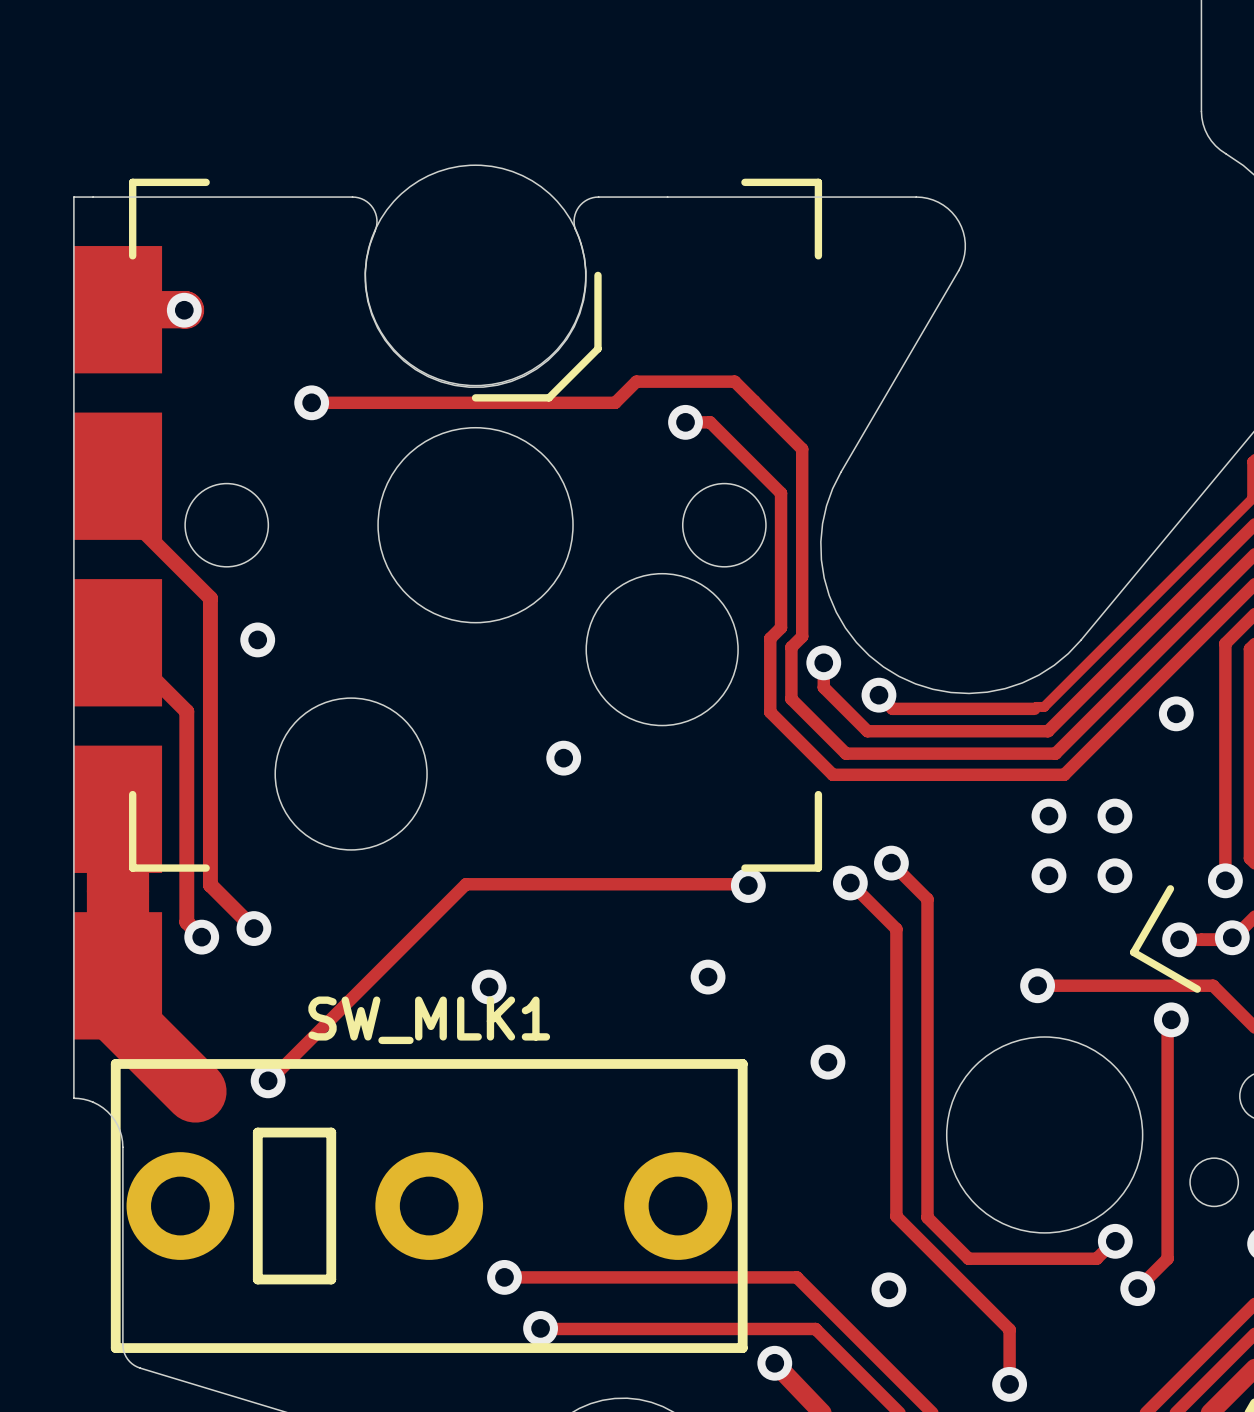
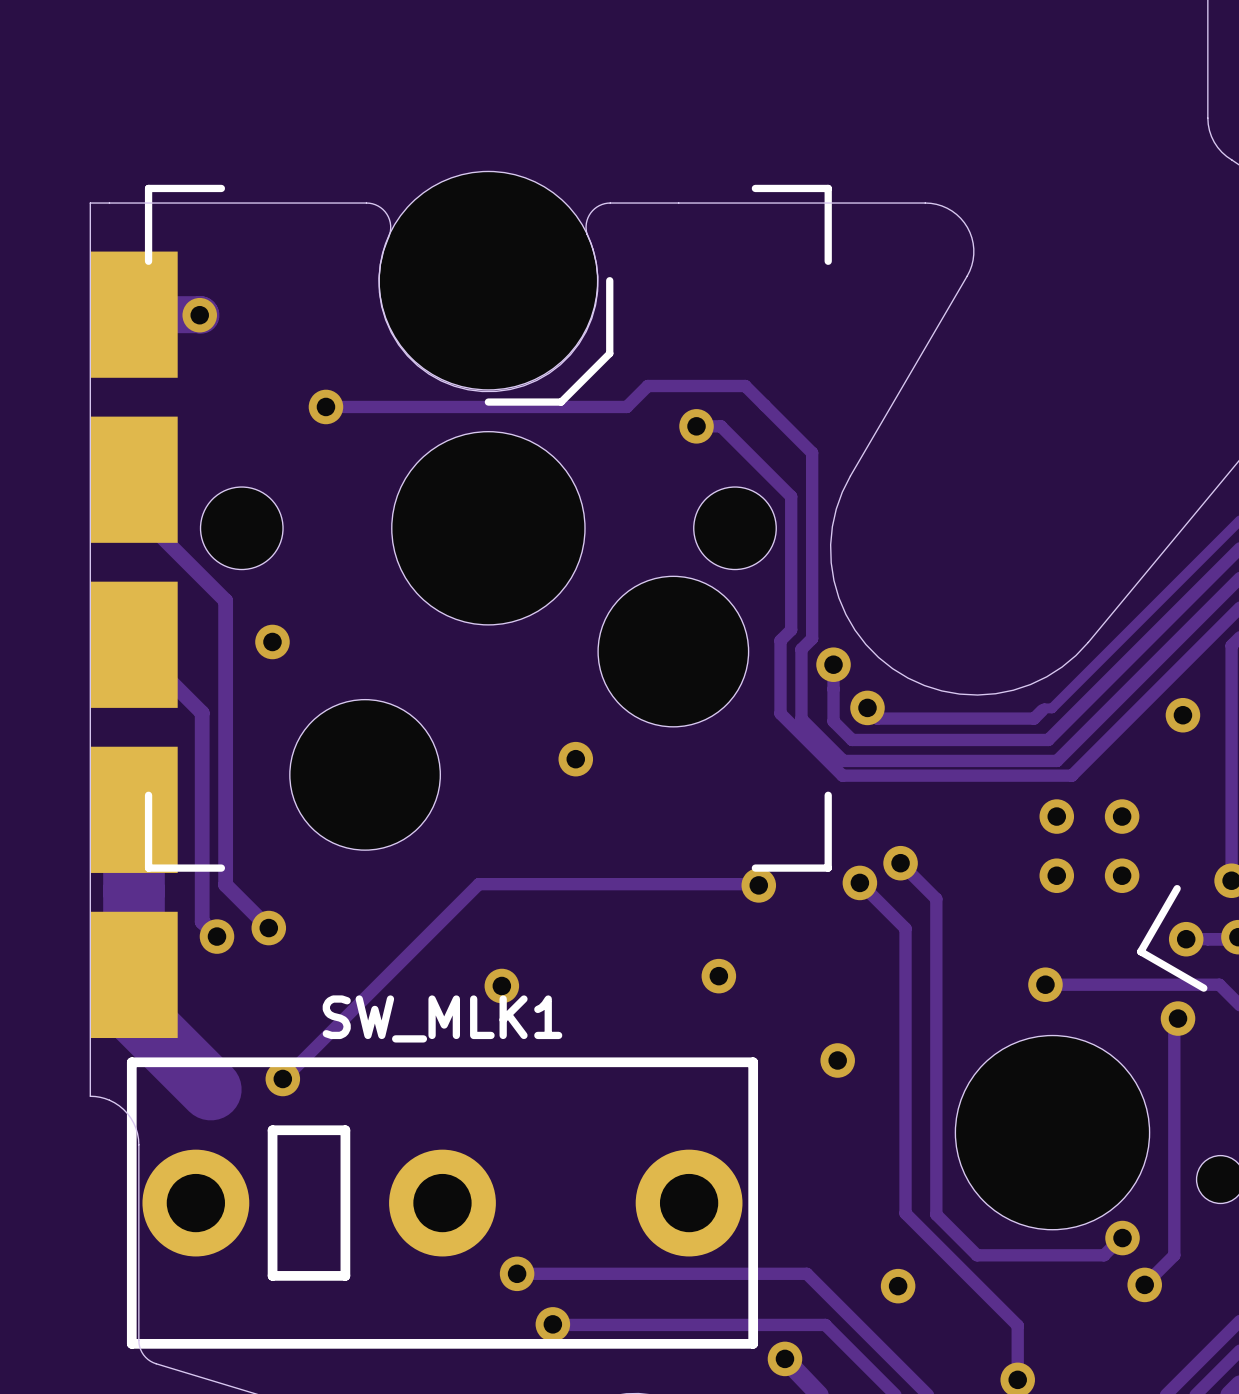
track: (823, 687) (867, 731) (1048, 731) -> (833, 689) (833, 721) (852, 739) (1048, 739) (1055, 732)
track: (878, 695) (892, 708) (1034, 708) -> (868, 709) (877, 718) (1034, 718) (1042, 710)
via position: (878, 695) -> (867, 707)
track: (791, 699) (845, 753) (1055, 753) -> (801, 700) (801, 718) (843, 760) (1056, 760) (1063, 754)

